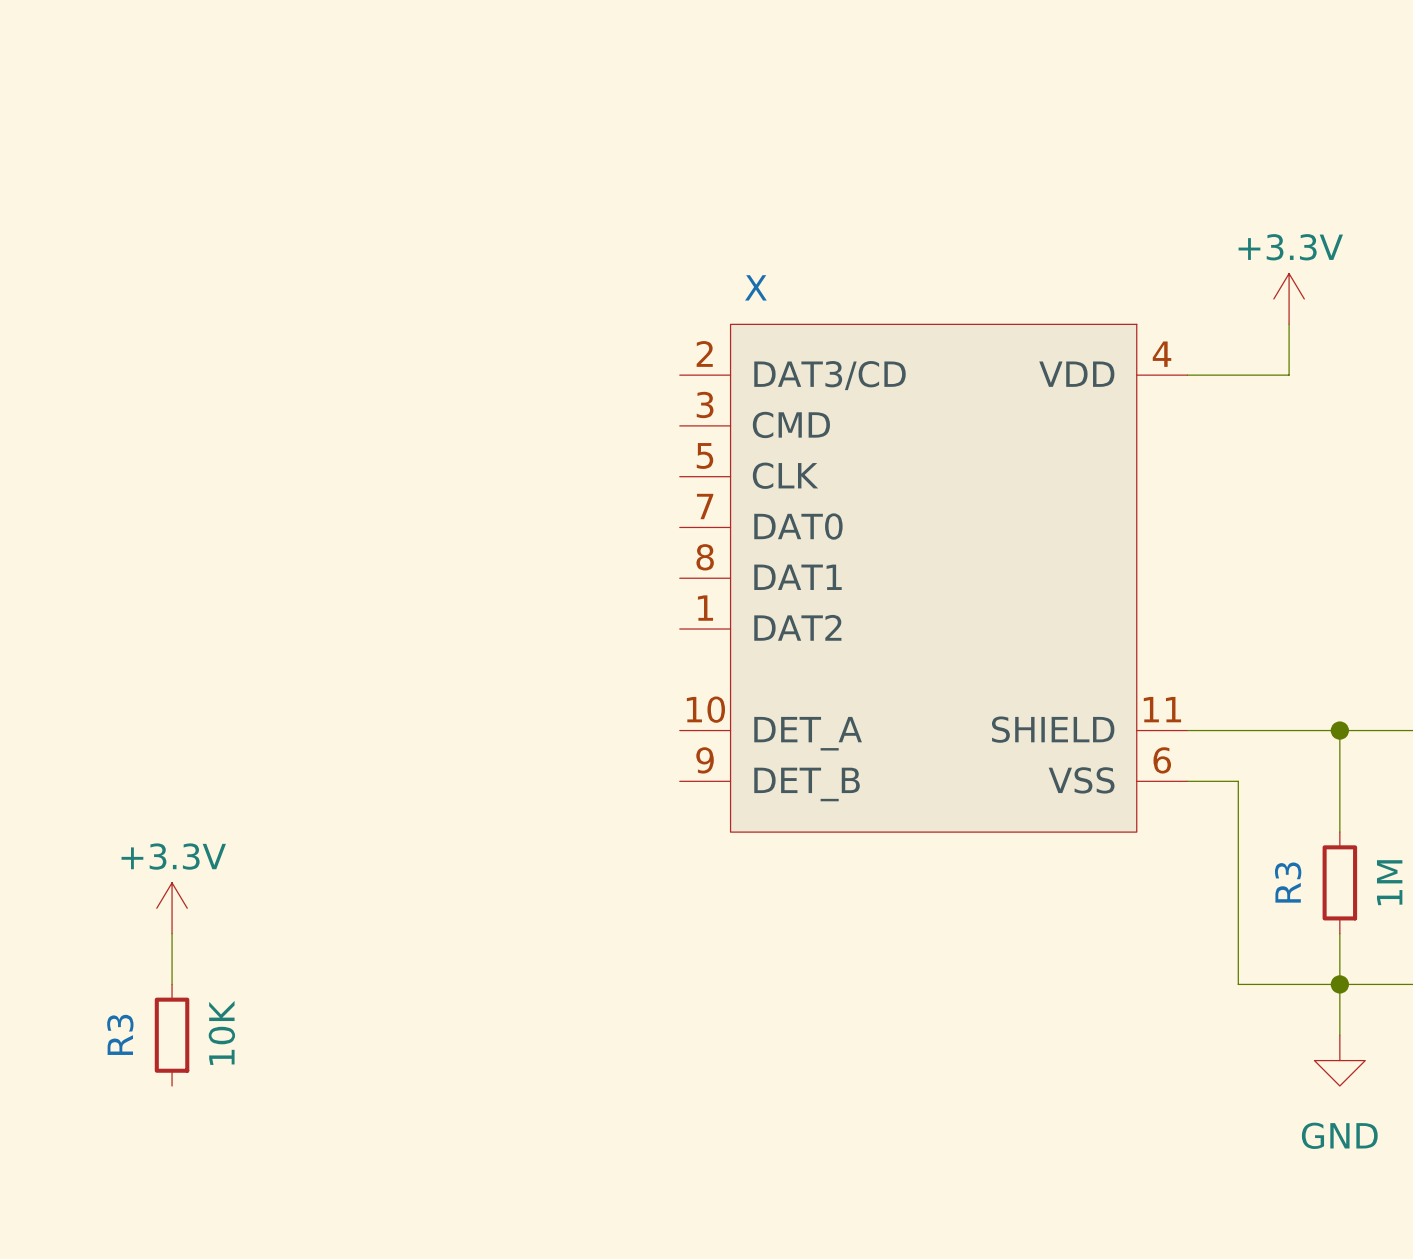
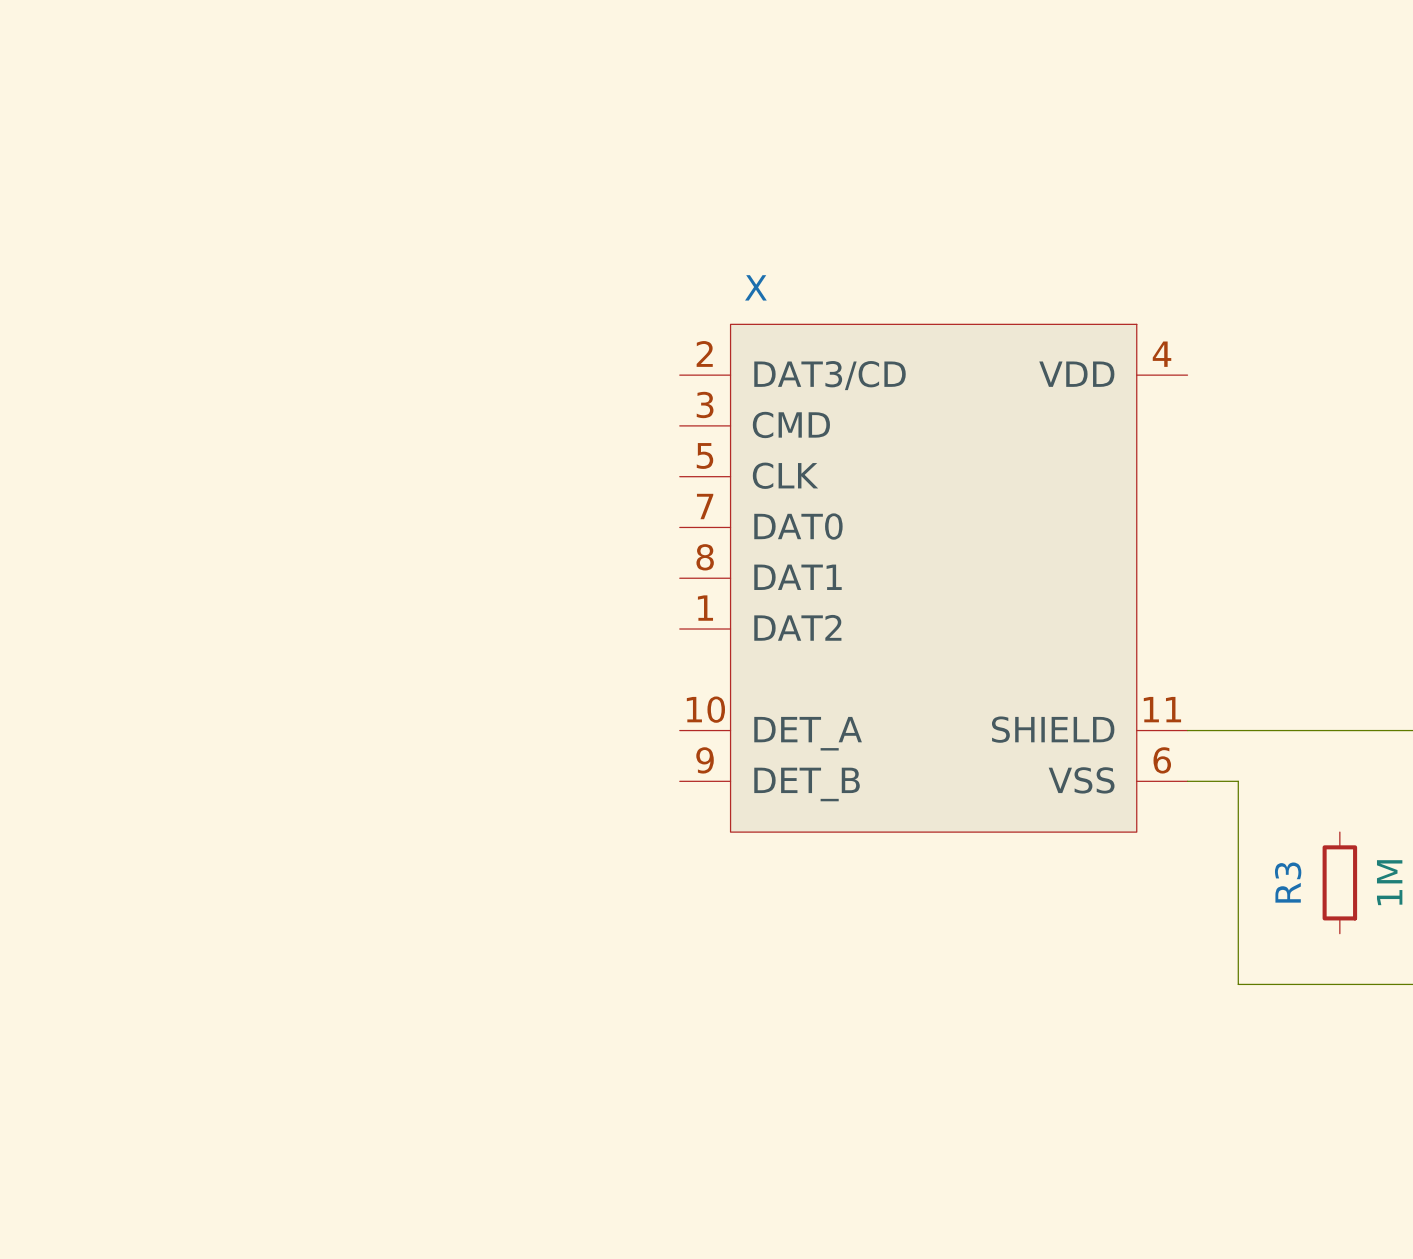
power symbol: +3.3V (1289, 298) -> none
wire: (1289, 324) (1289, 375) (1187, 375) -> none
wire: (1339, 730) (1339, 832) -> none
junction: (1339, 730) -> none
power symbol: +3.3V (172, 908) -> none
wire: (172, 933) (172, 984) -> none
wire: (1339, 933) (1339, 1035) -> none
junction: (1339, 984) -> none
R3: 10K (172, 1035) -> none
power symbol: GND (1339, 1060) -> none

